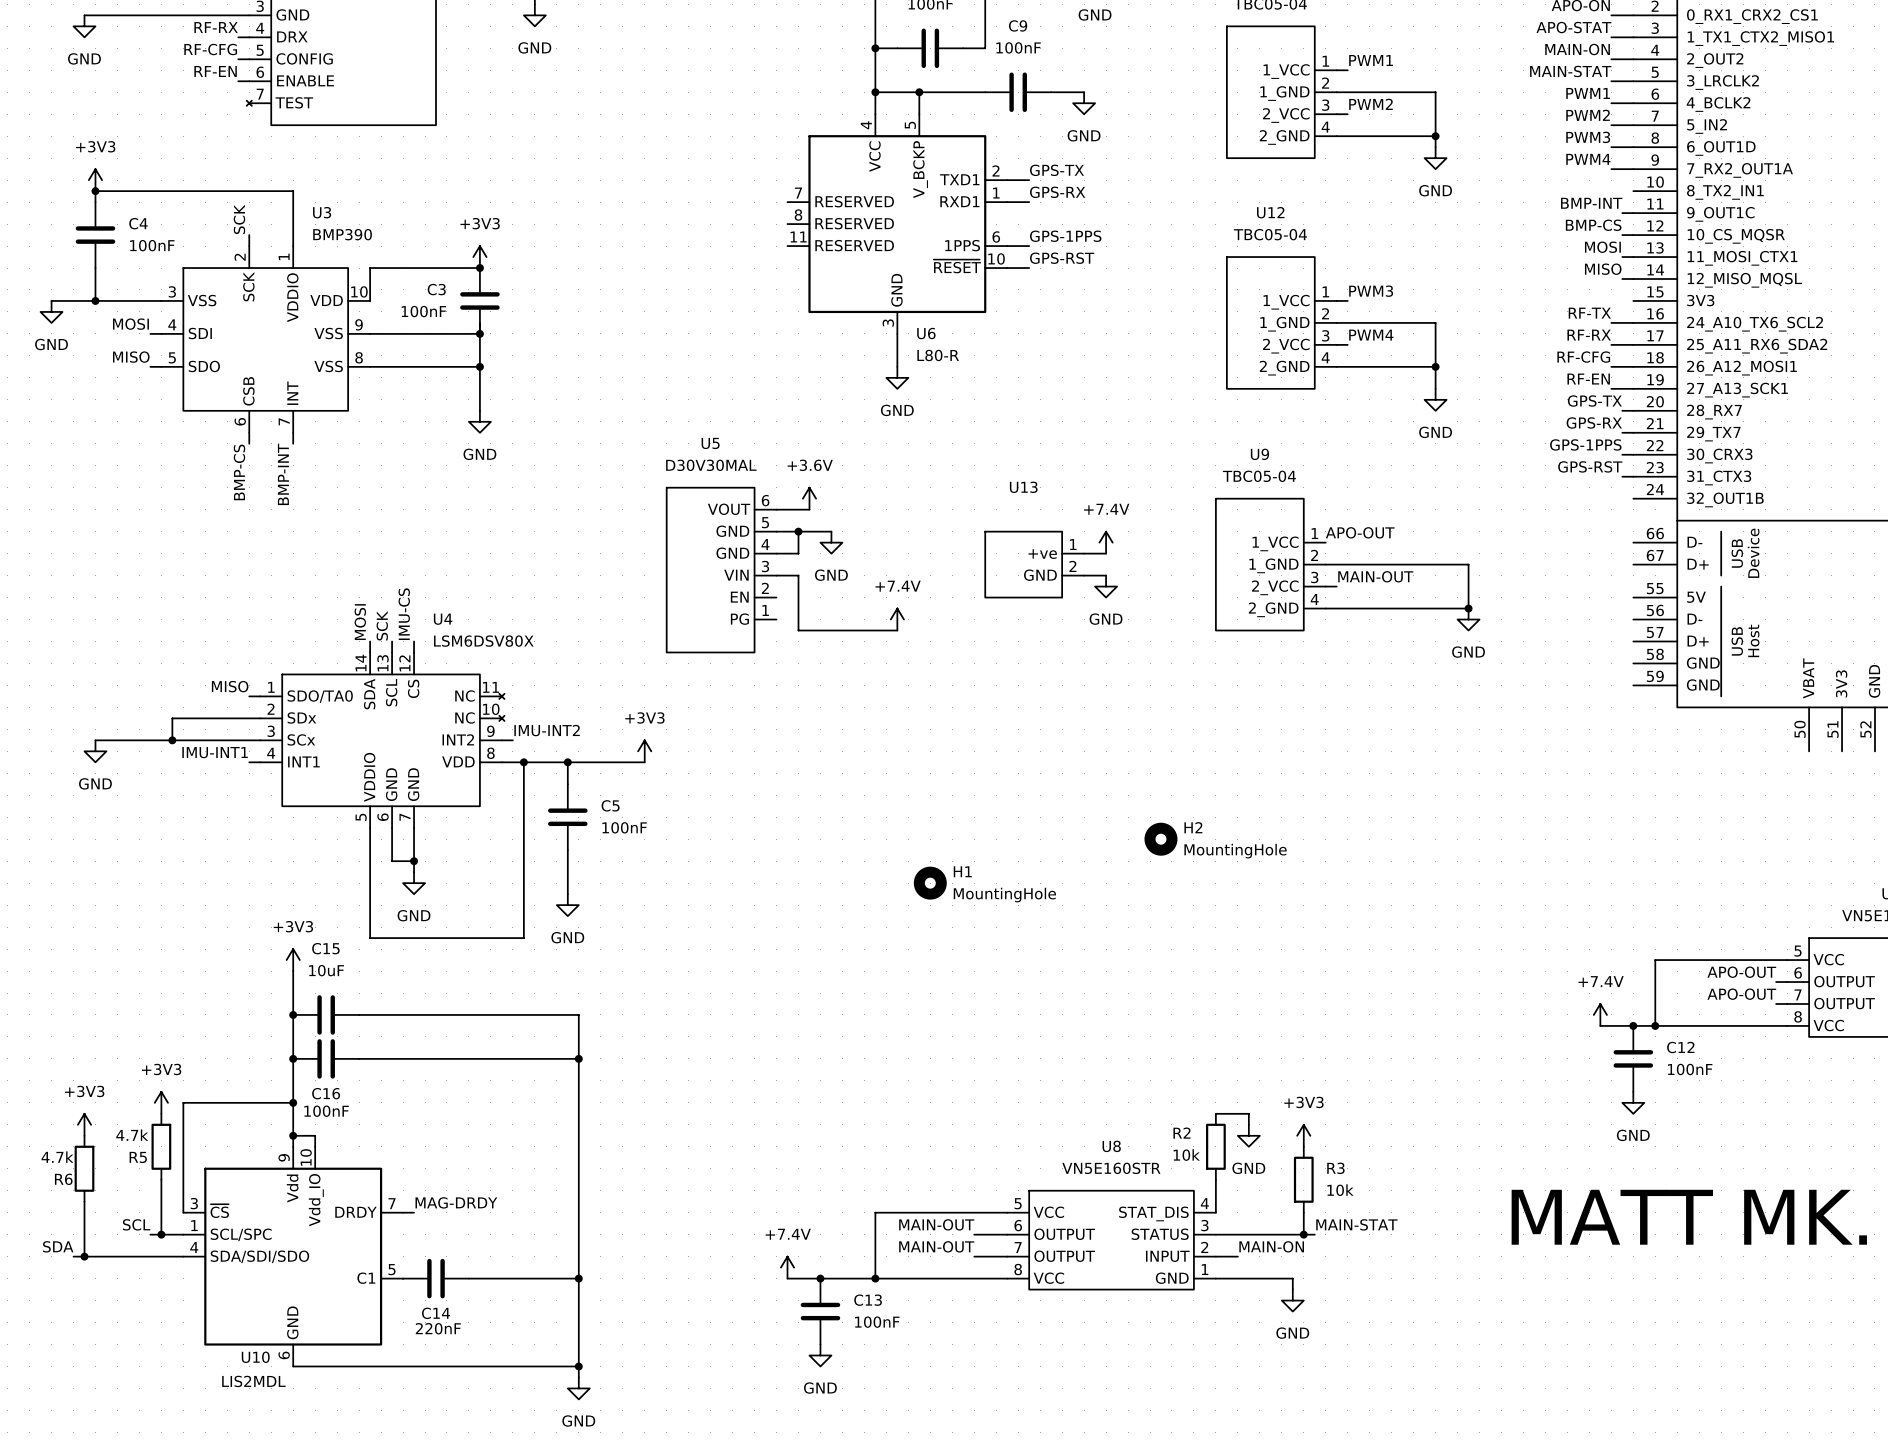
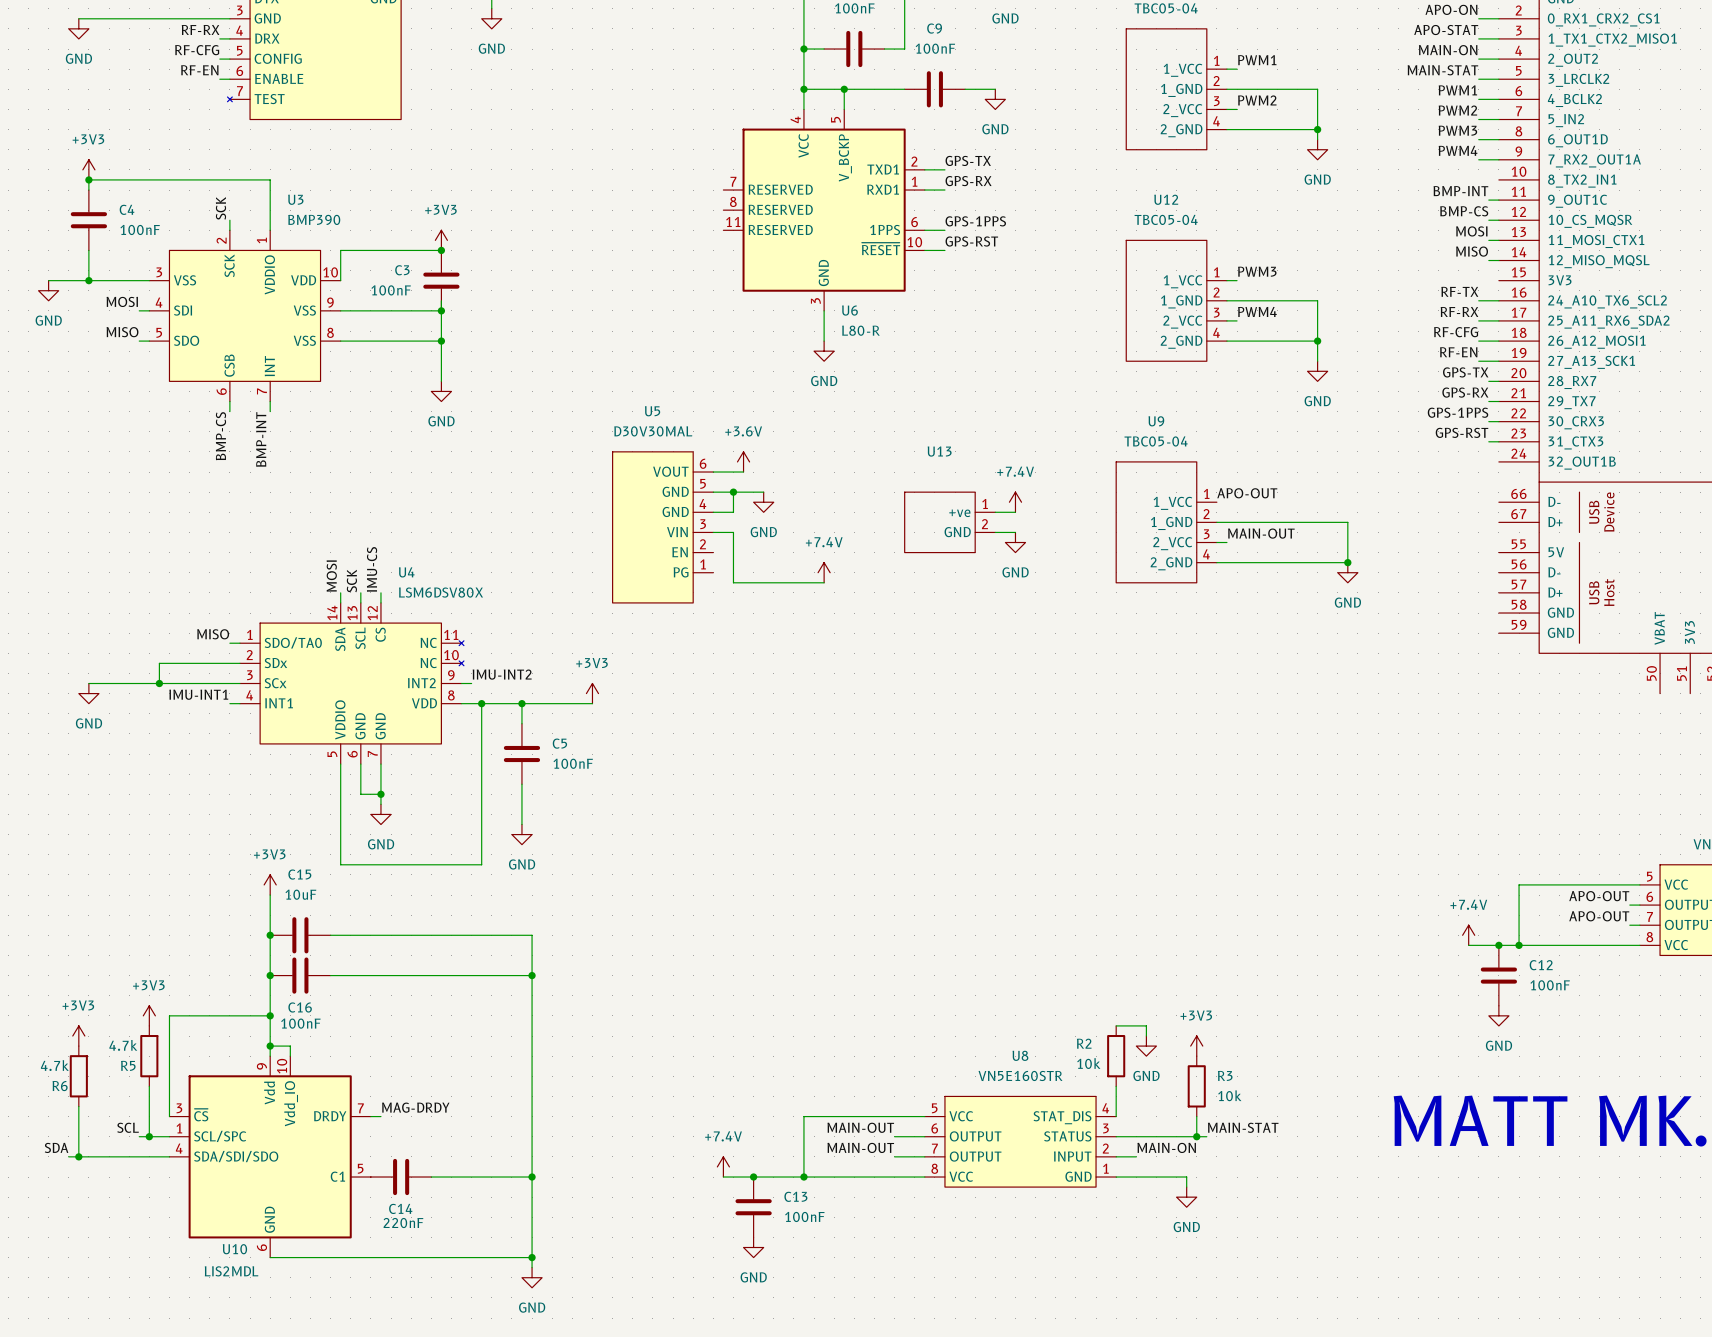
H2: MountingHole (1160, 839) -> none
H1: MountingHole (930, 883) -> none

